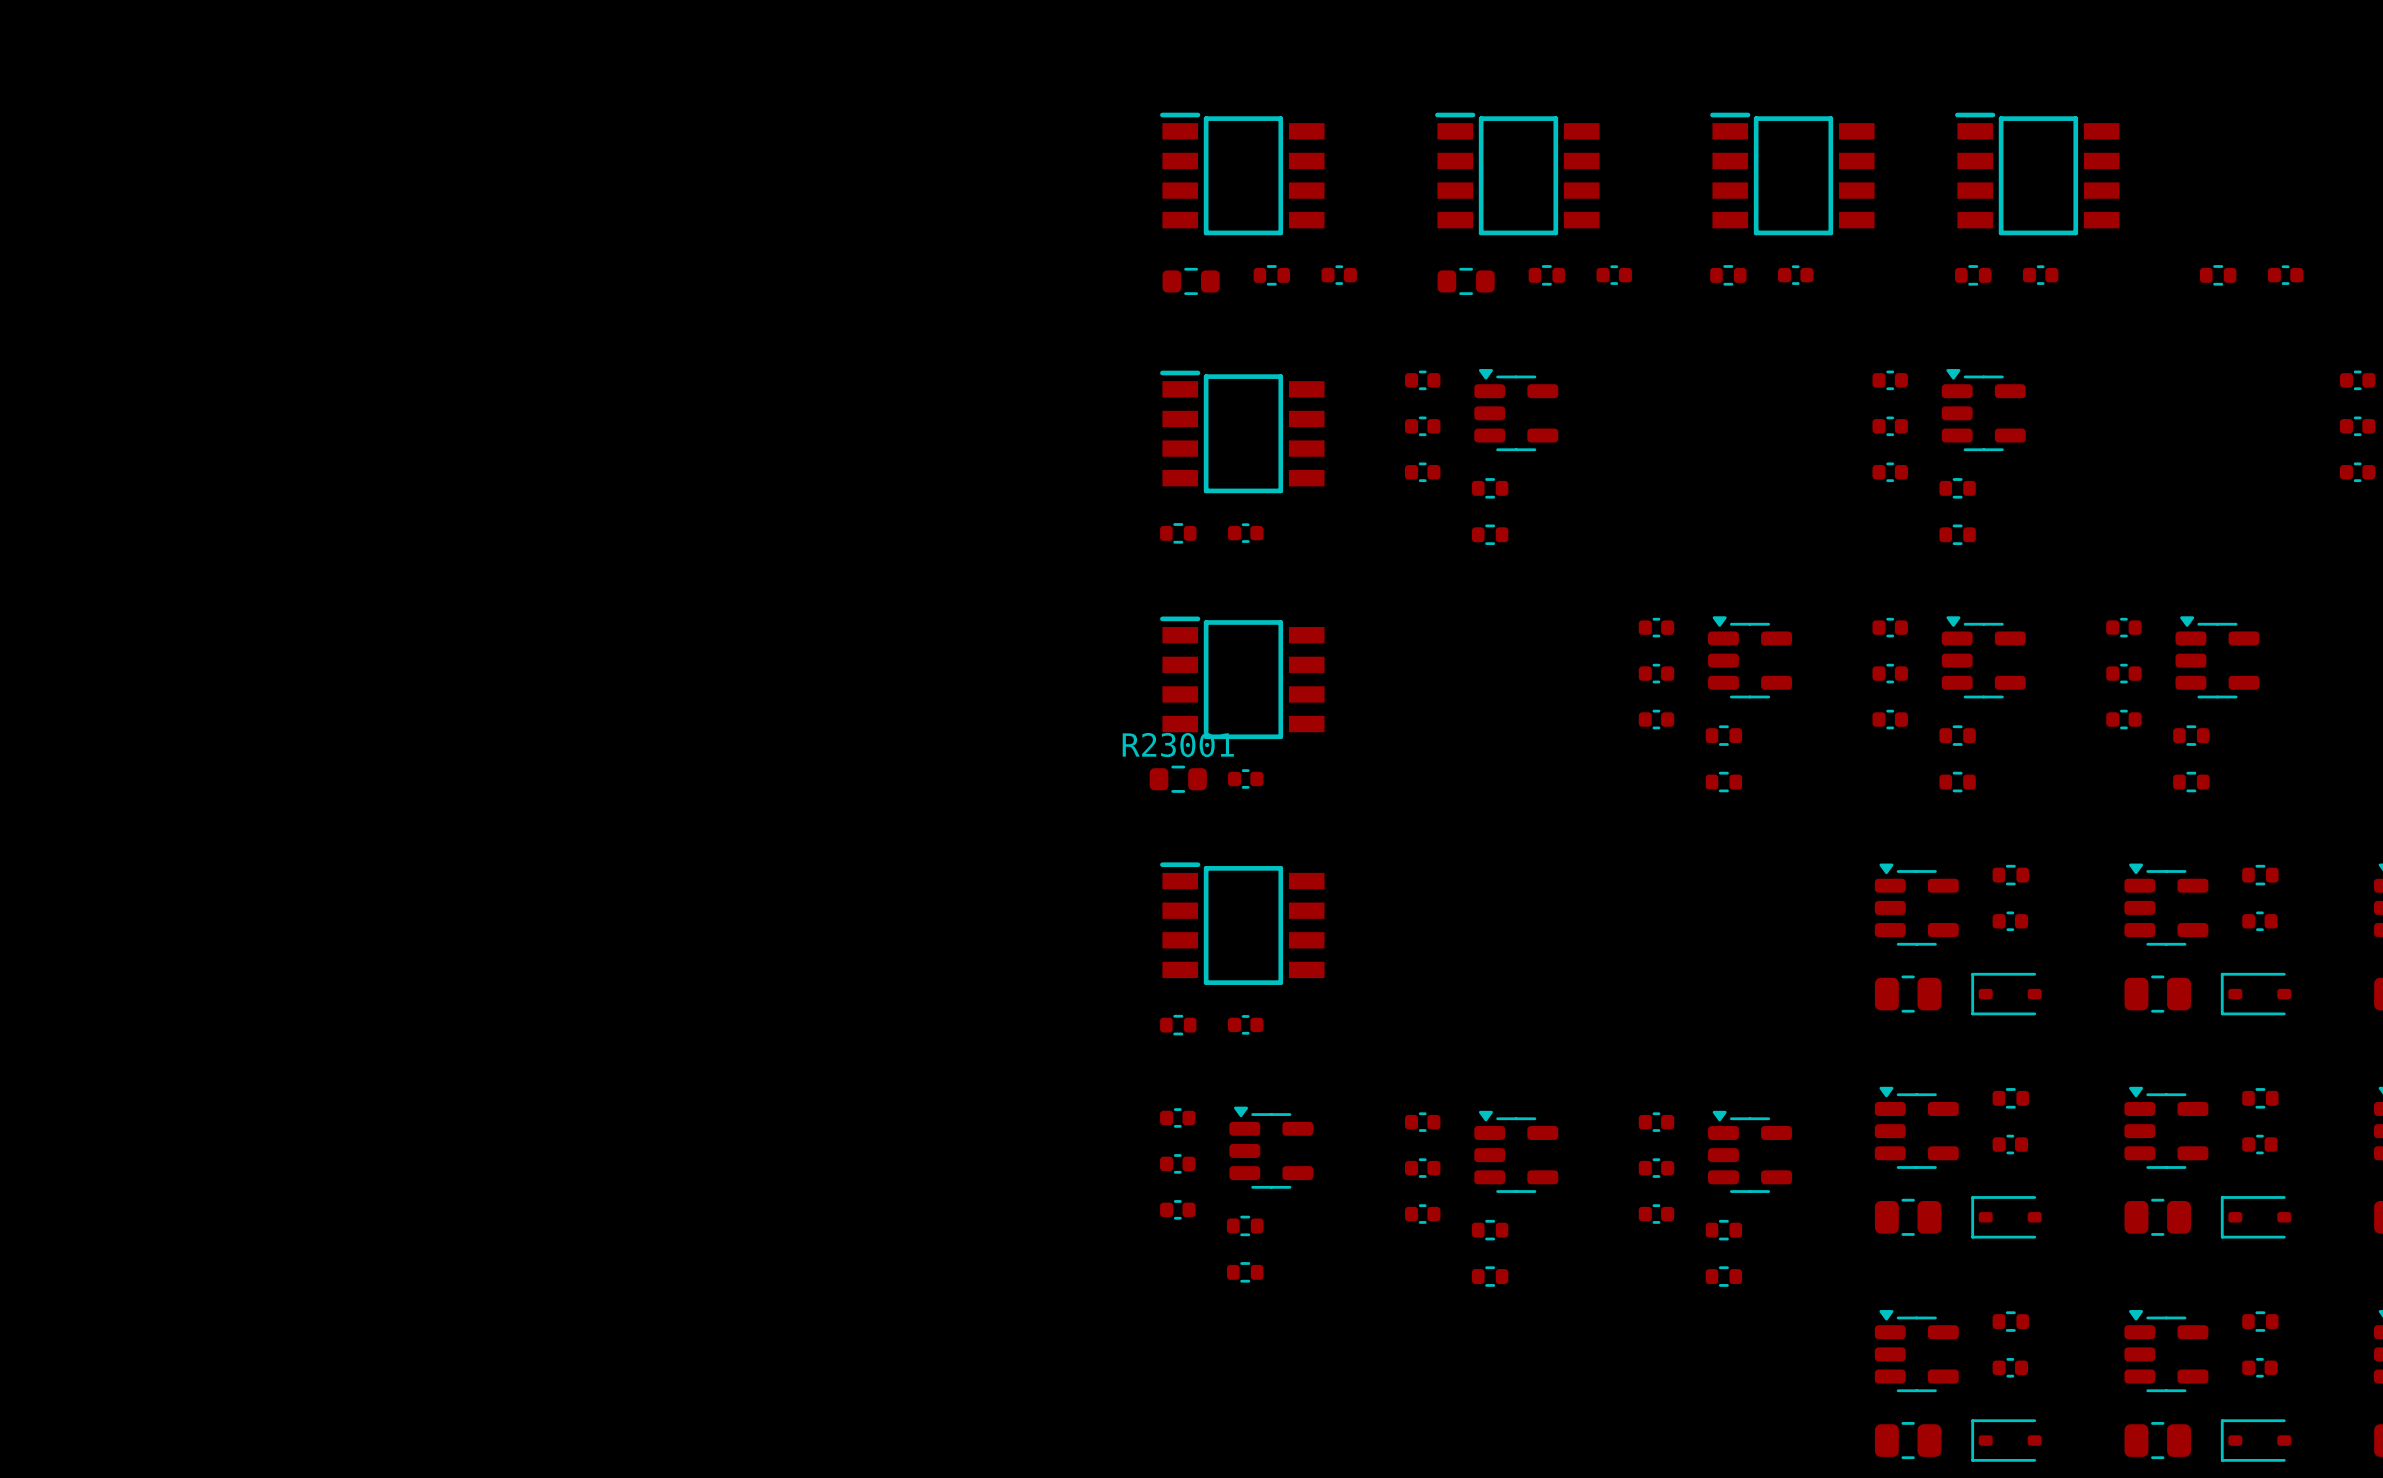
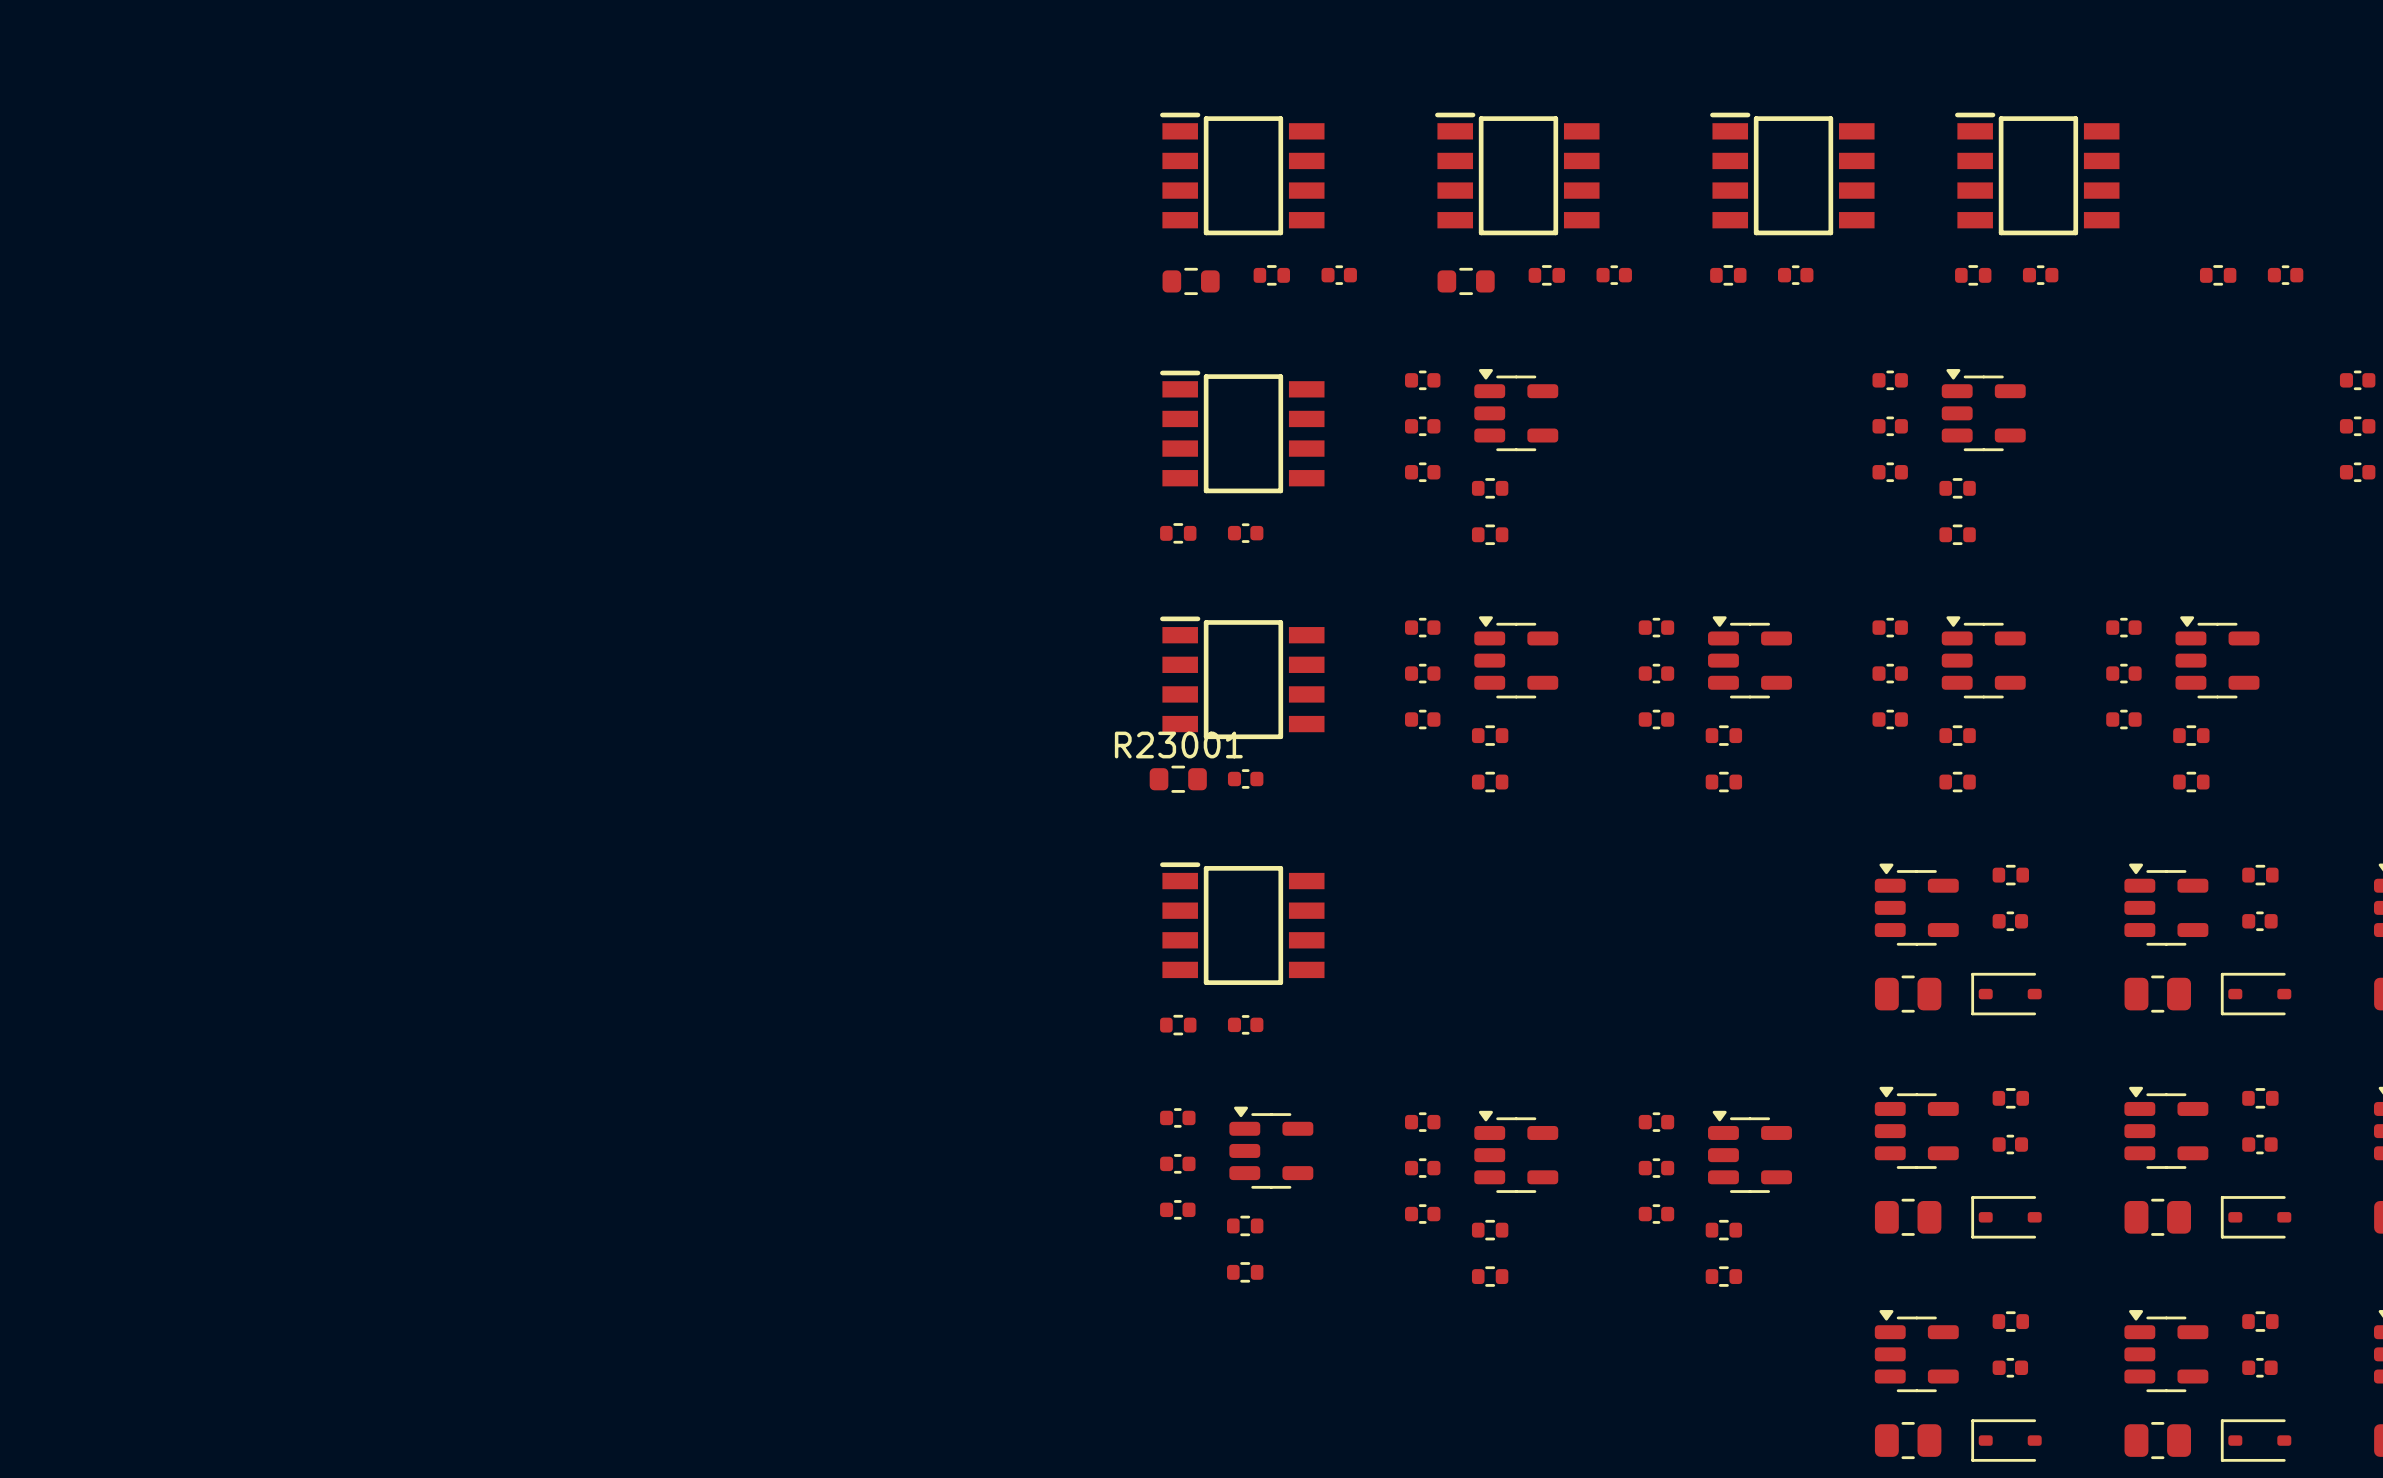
part: none -> (1422, 627)
part: none -> (1516, 657)
part: none -> (1422, 673)
part: none -> (1422, 719)
part: none -> (1490, 735)
part: none -> (1490, 782)

